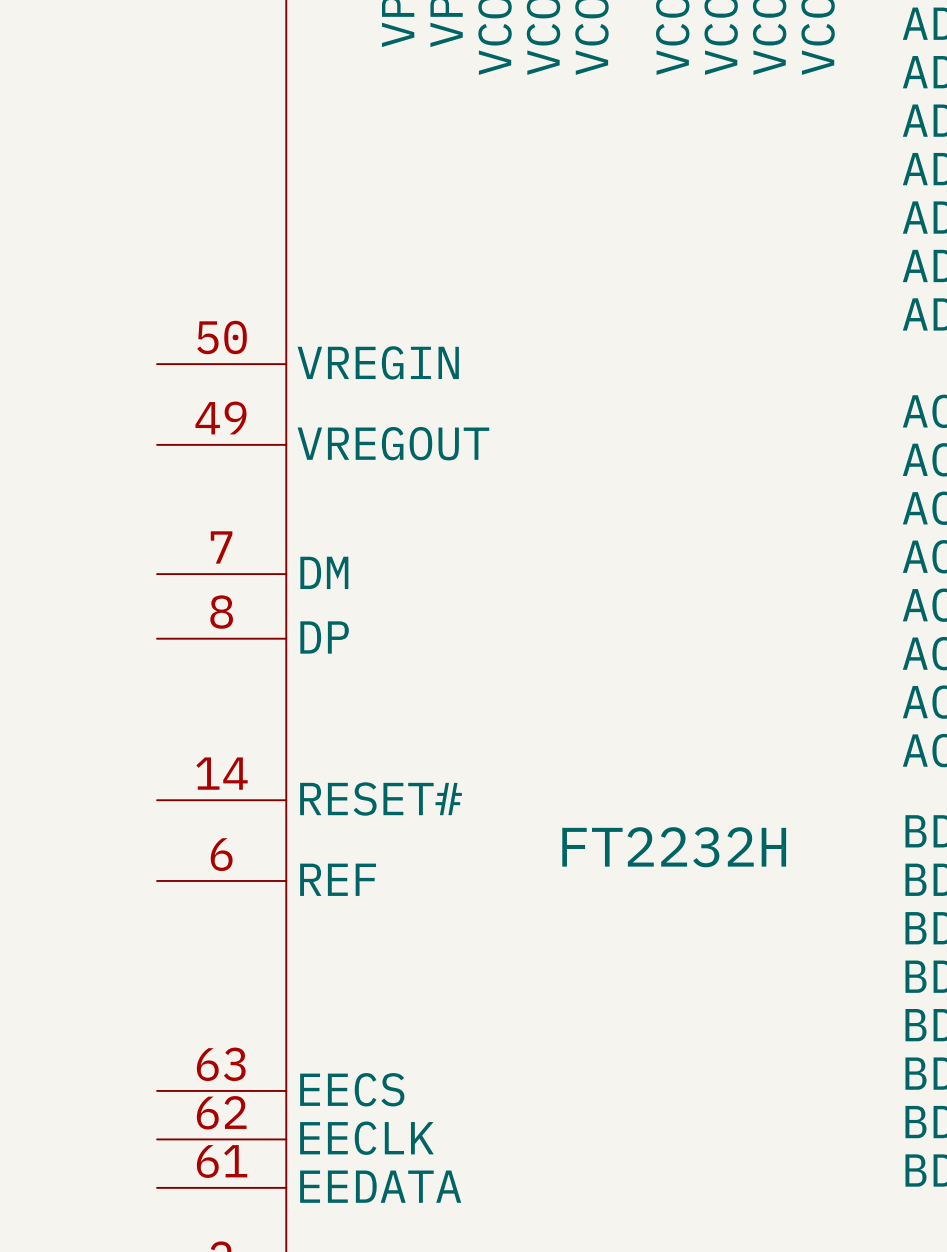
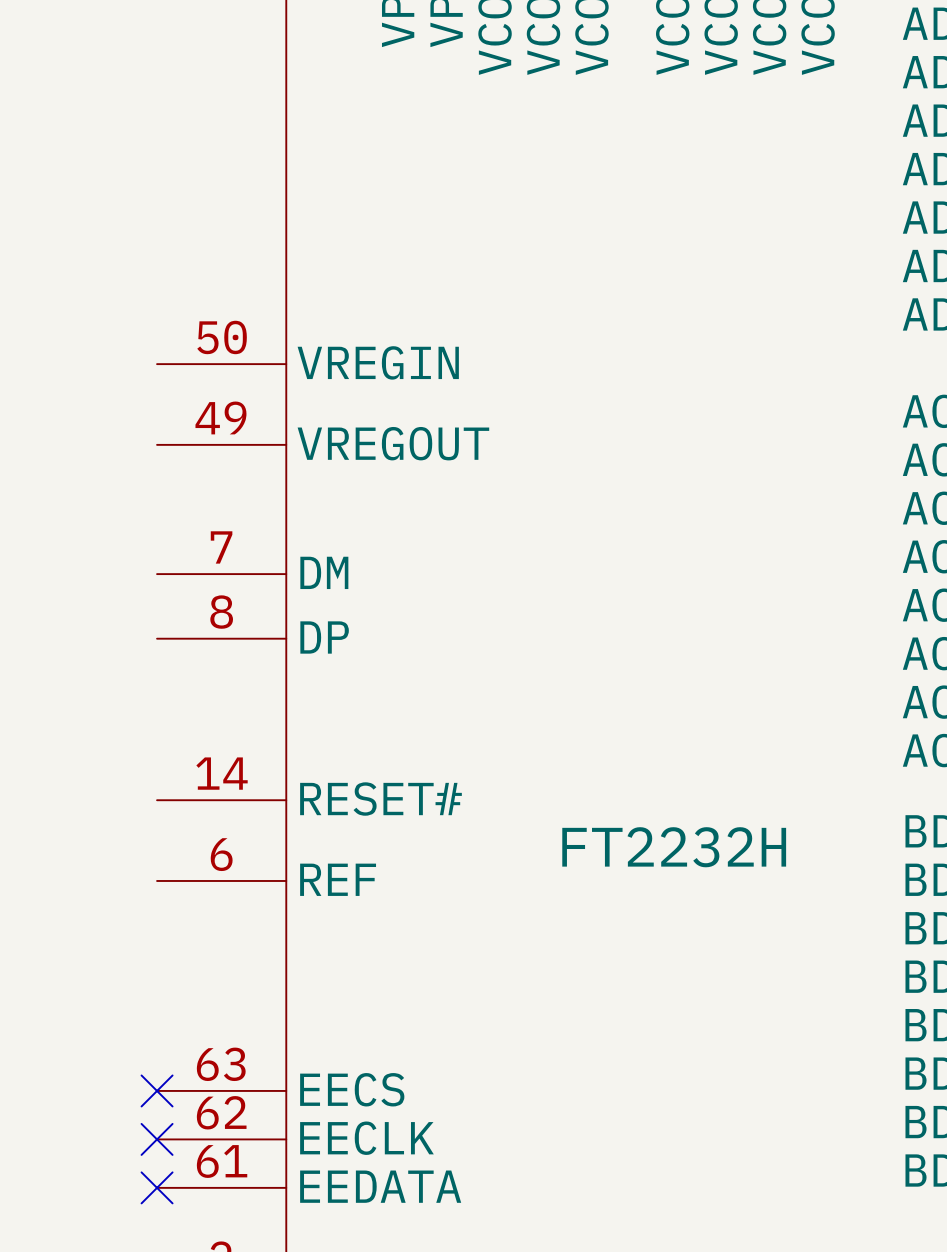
no-connect mark: none -> (157, 1090)
no-connect mark: none -> (157, 1139)
no-connect mark: none -> (157, 1187)

